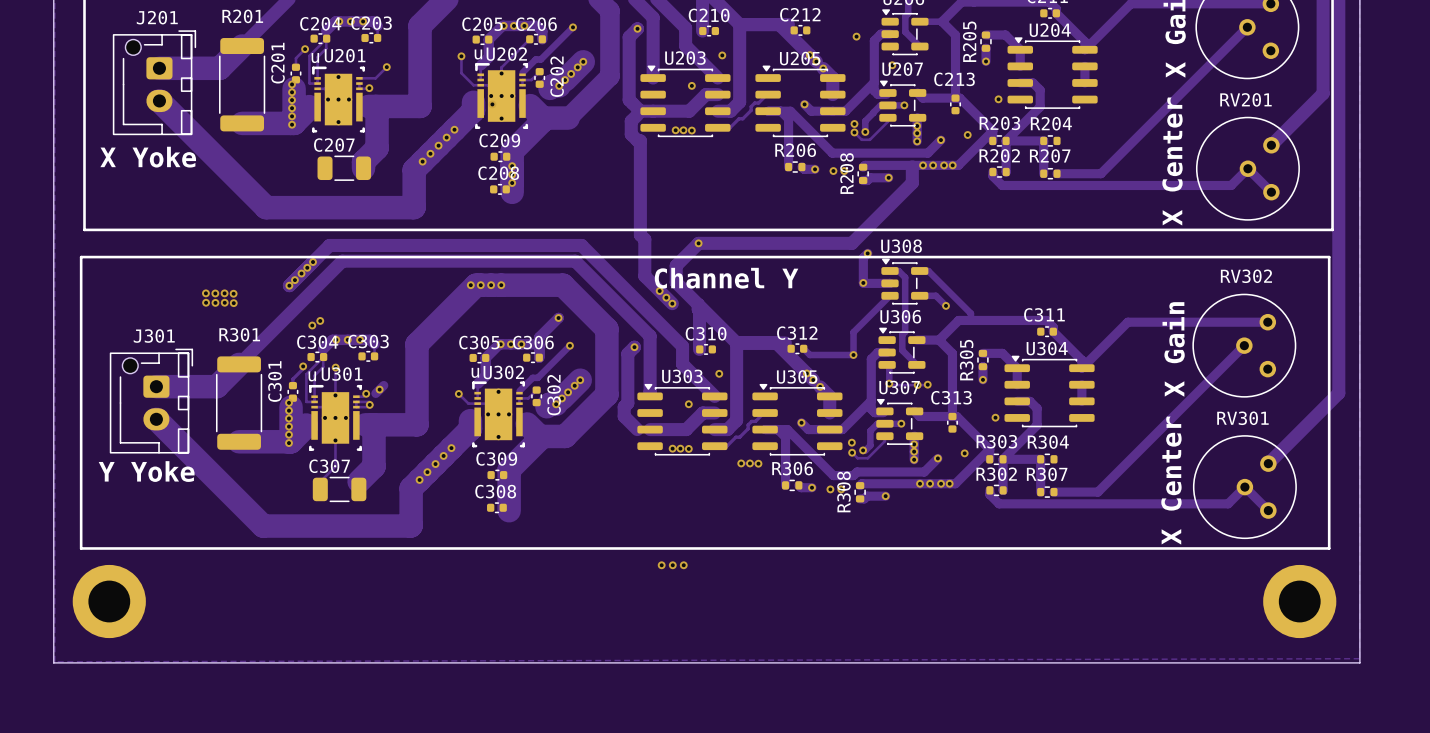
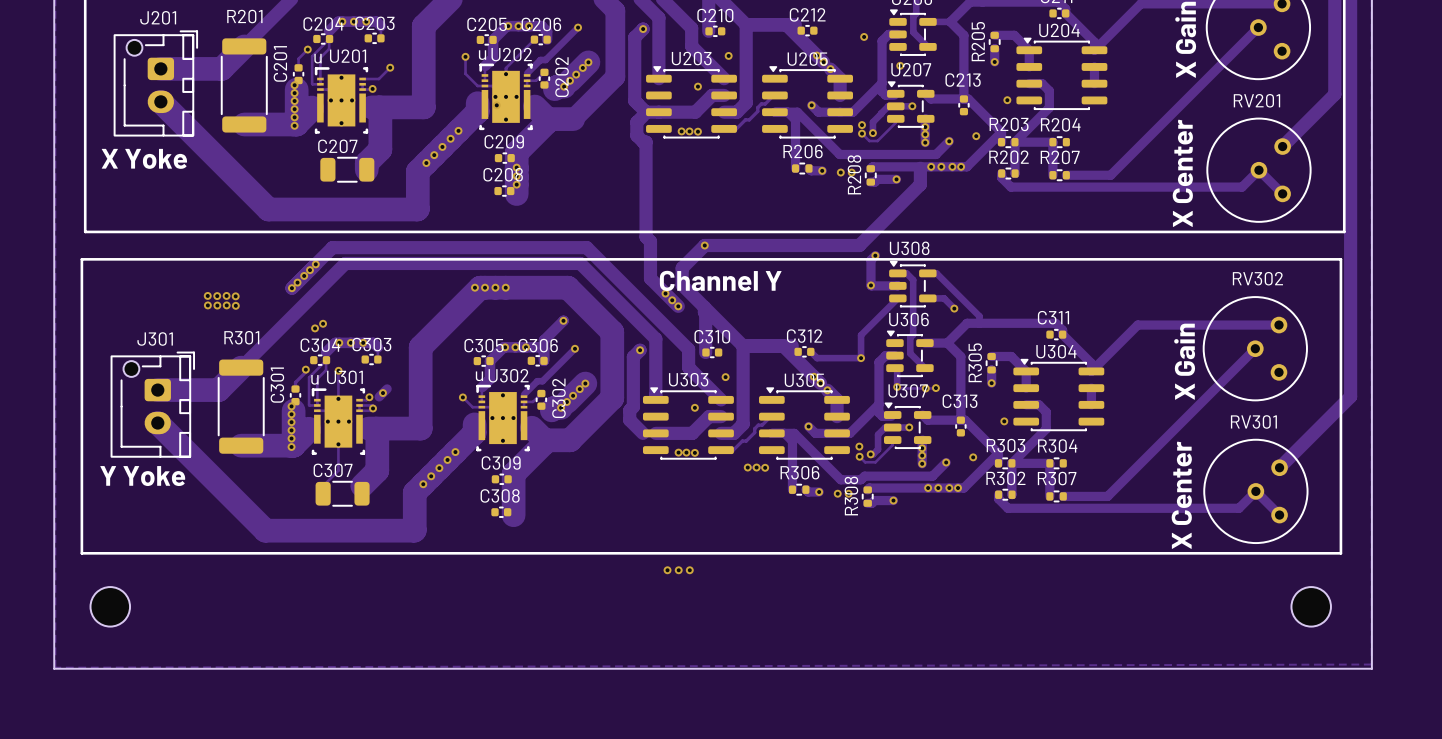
part footprint: [72, 564, 146, 639] -> [90, 587, 131, 627]
part footprint: [1263, 564, 1337, 639] -> [1291, 587, 1331, 627]

